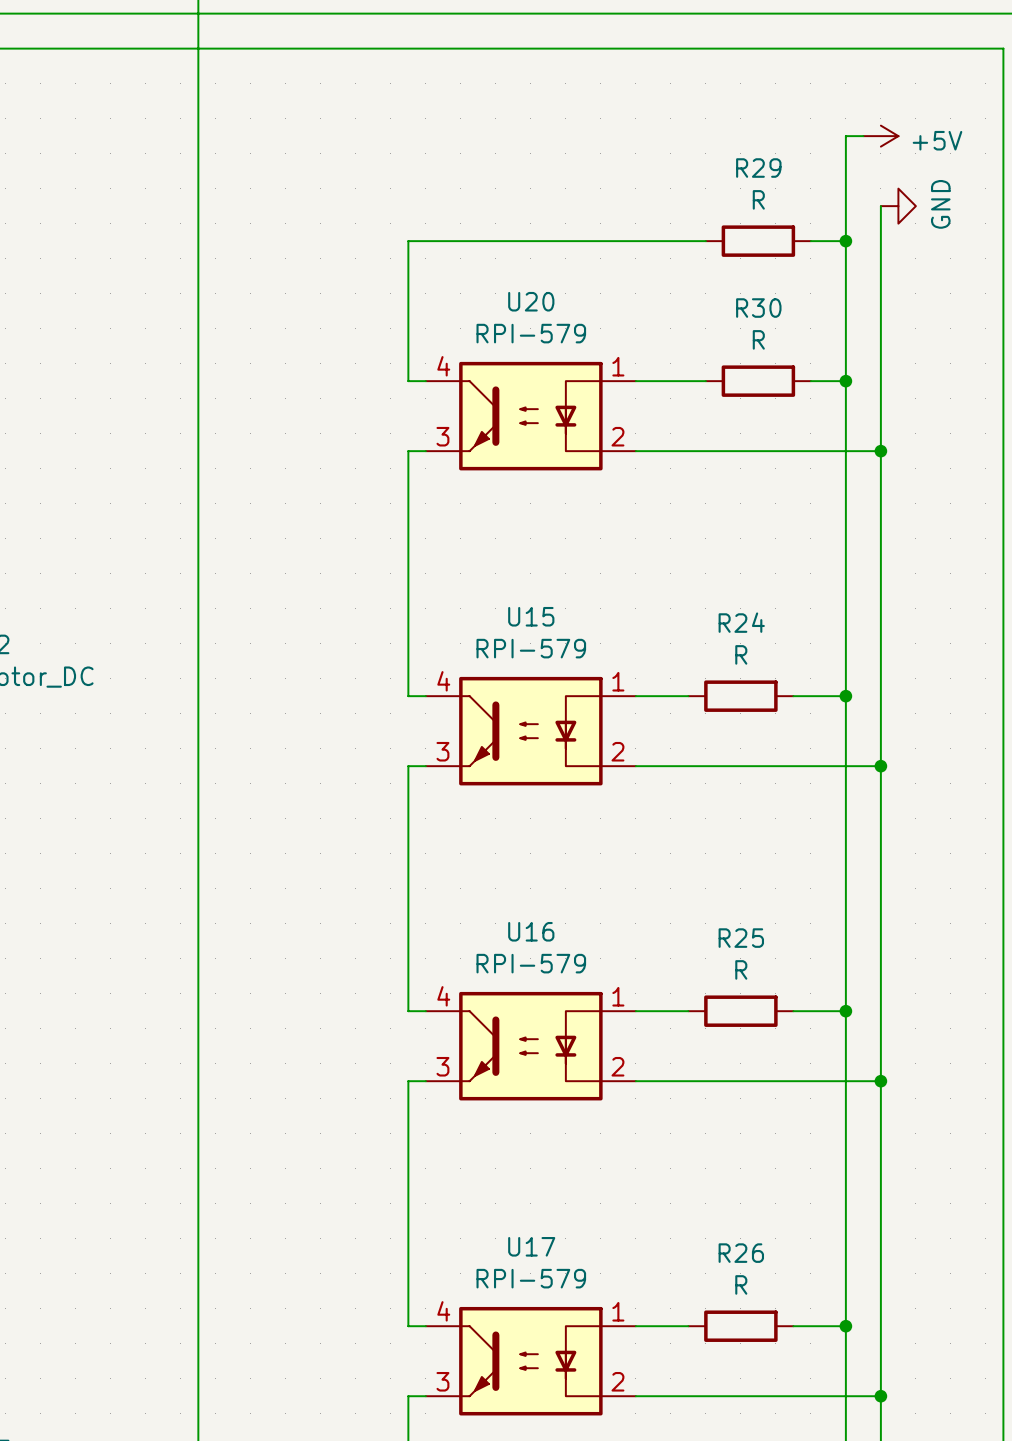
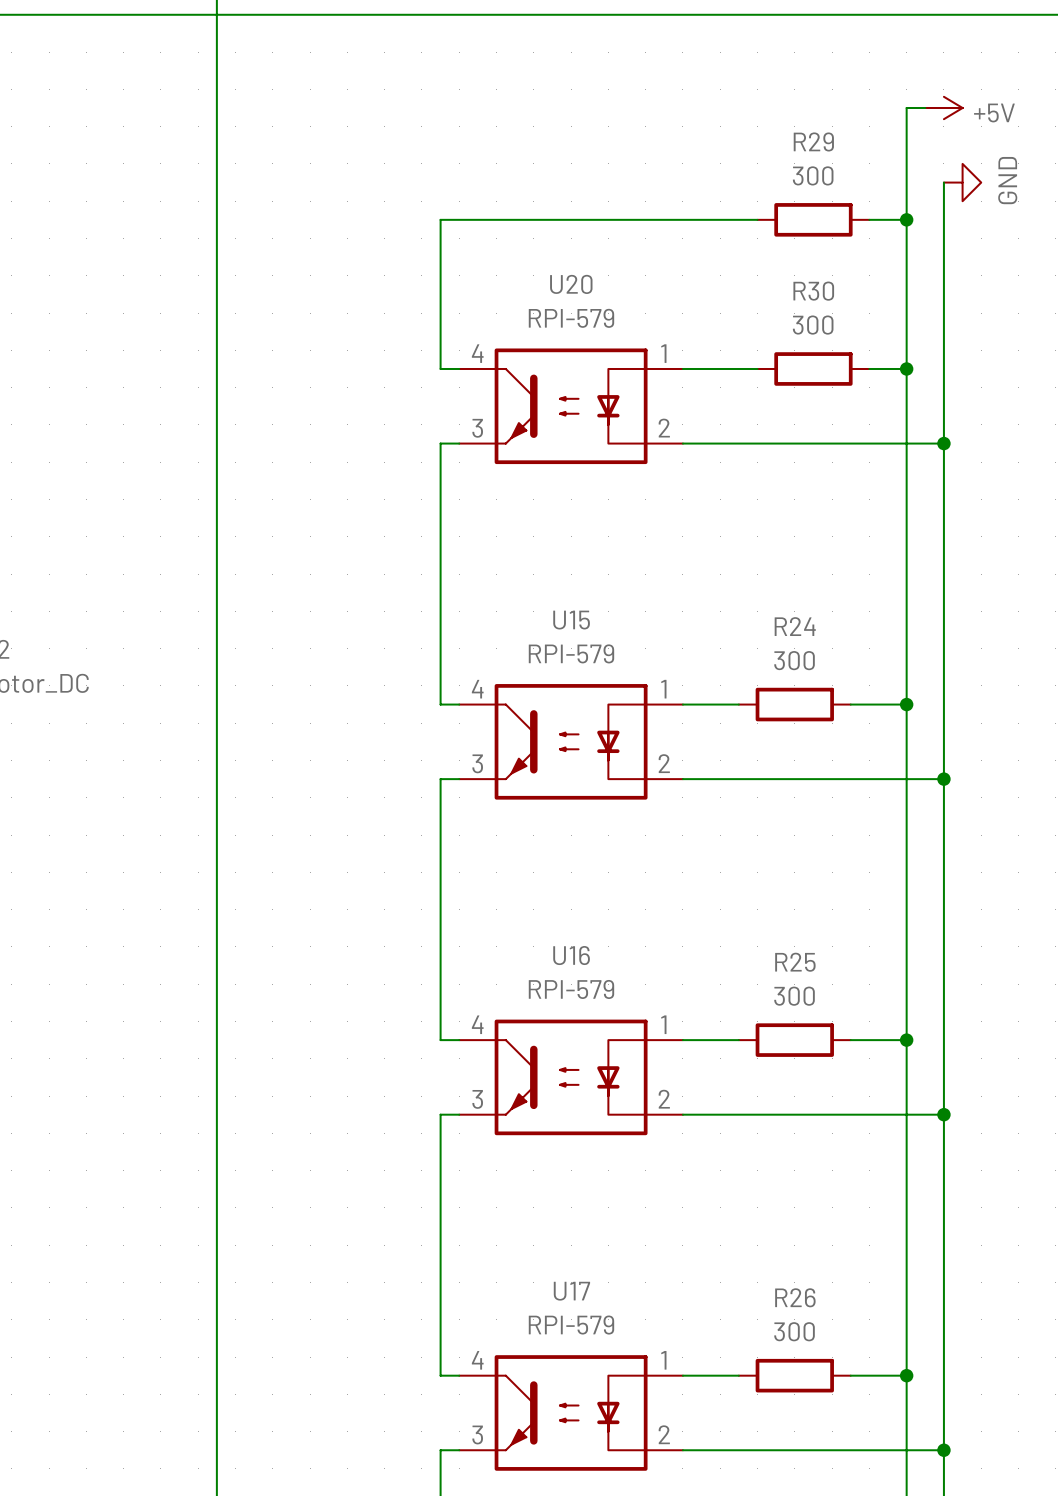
R29 value: R (758, 199) -> 300 (813, 175)
R30 value: R (758, 339) -> 300 (813, 325)
R24 value: R (741, 654) -> 300 (794, 660)
R25 value: R (741, 969) -> 300 (794, 996)
R26 value: R (741, 1284) -> 300 (794, 1331)

